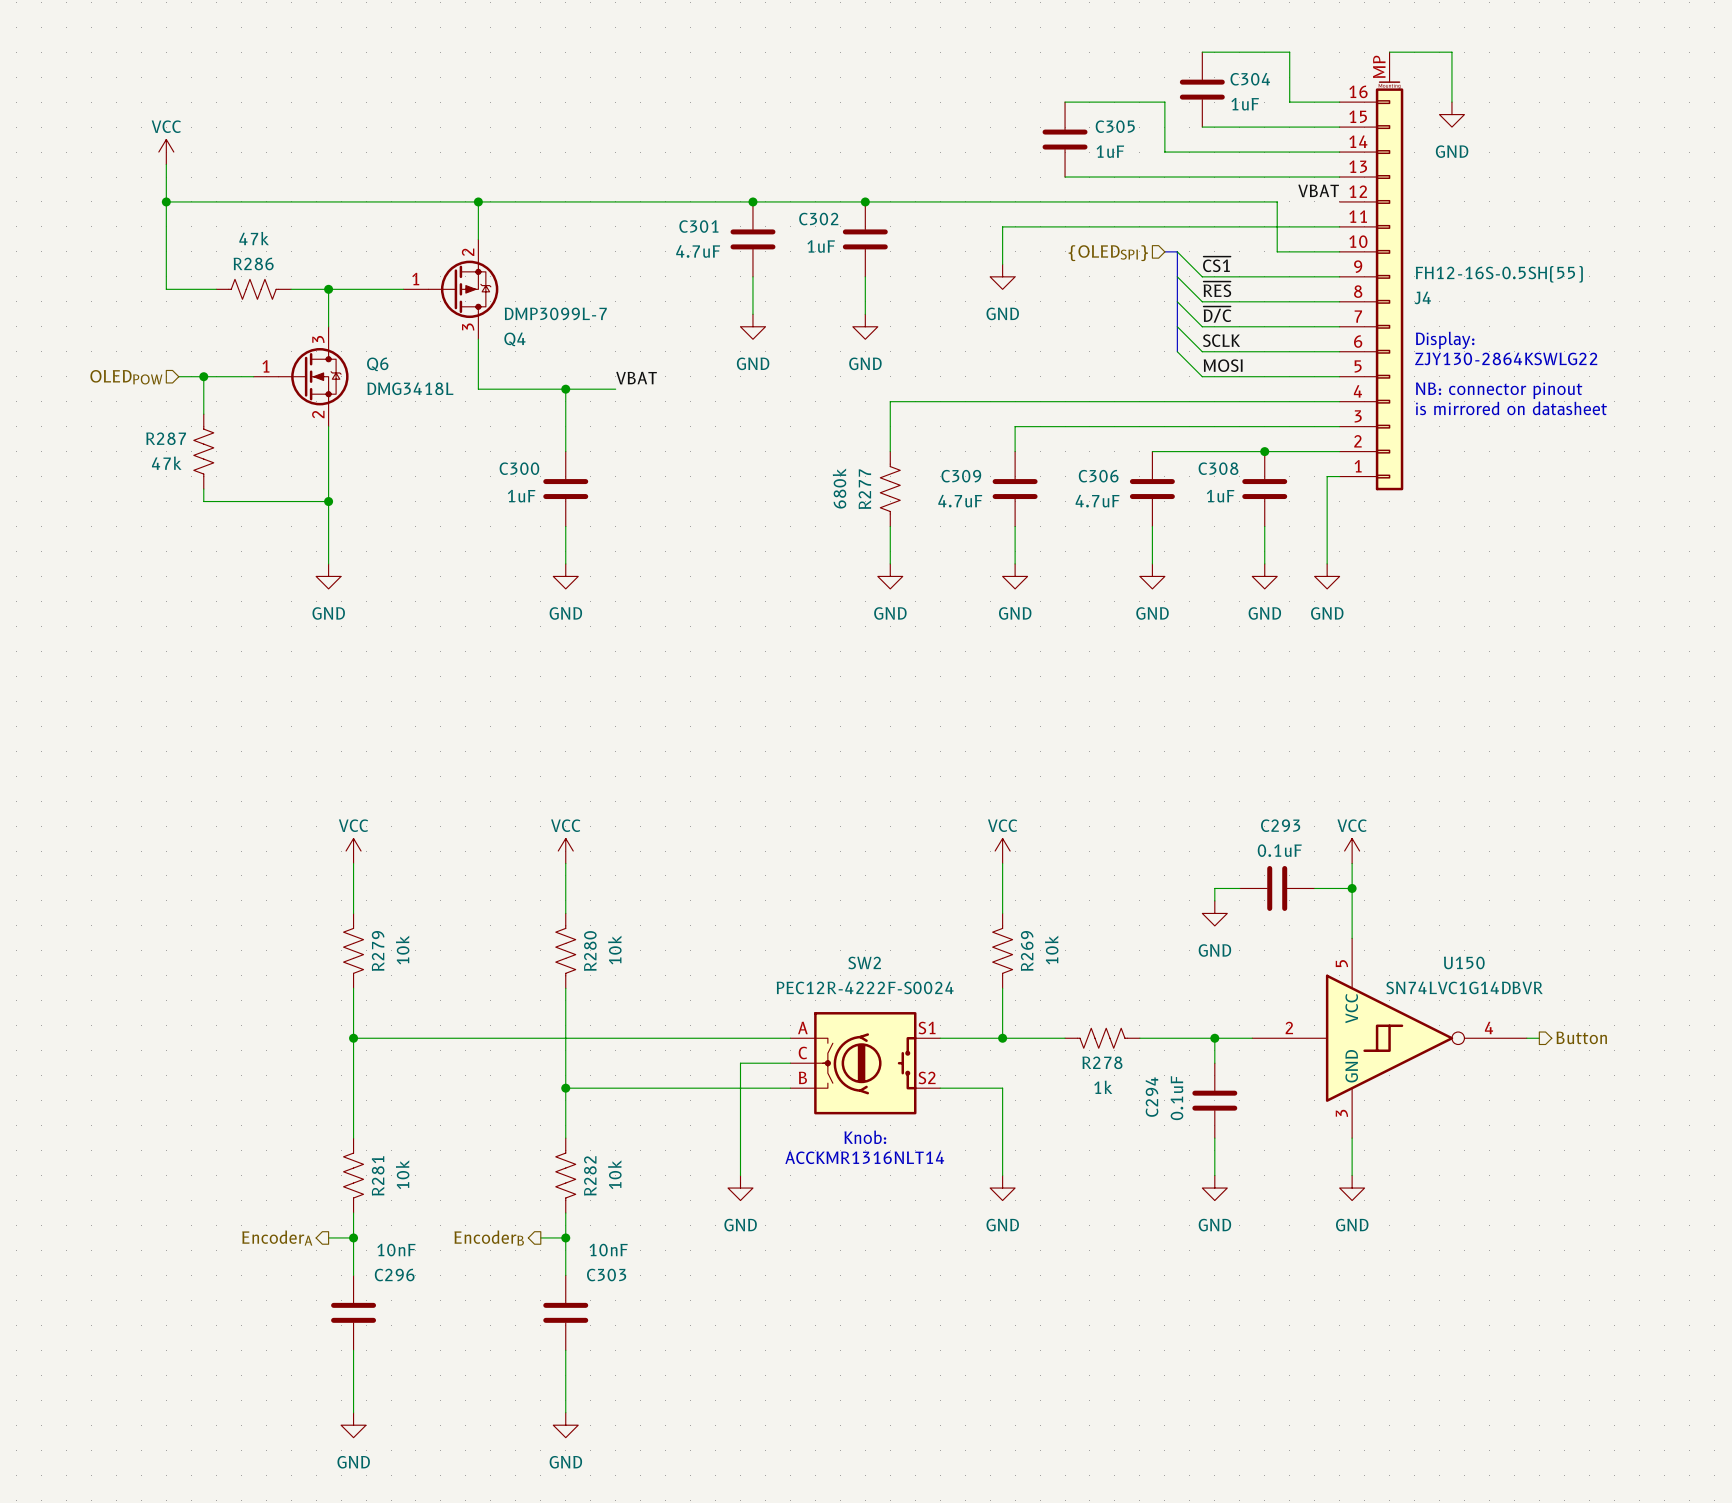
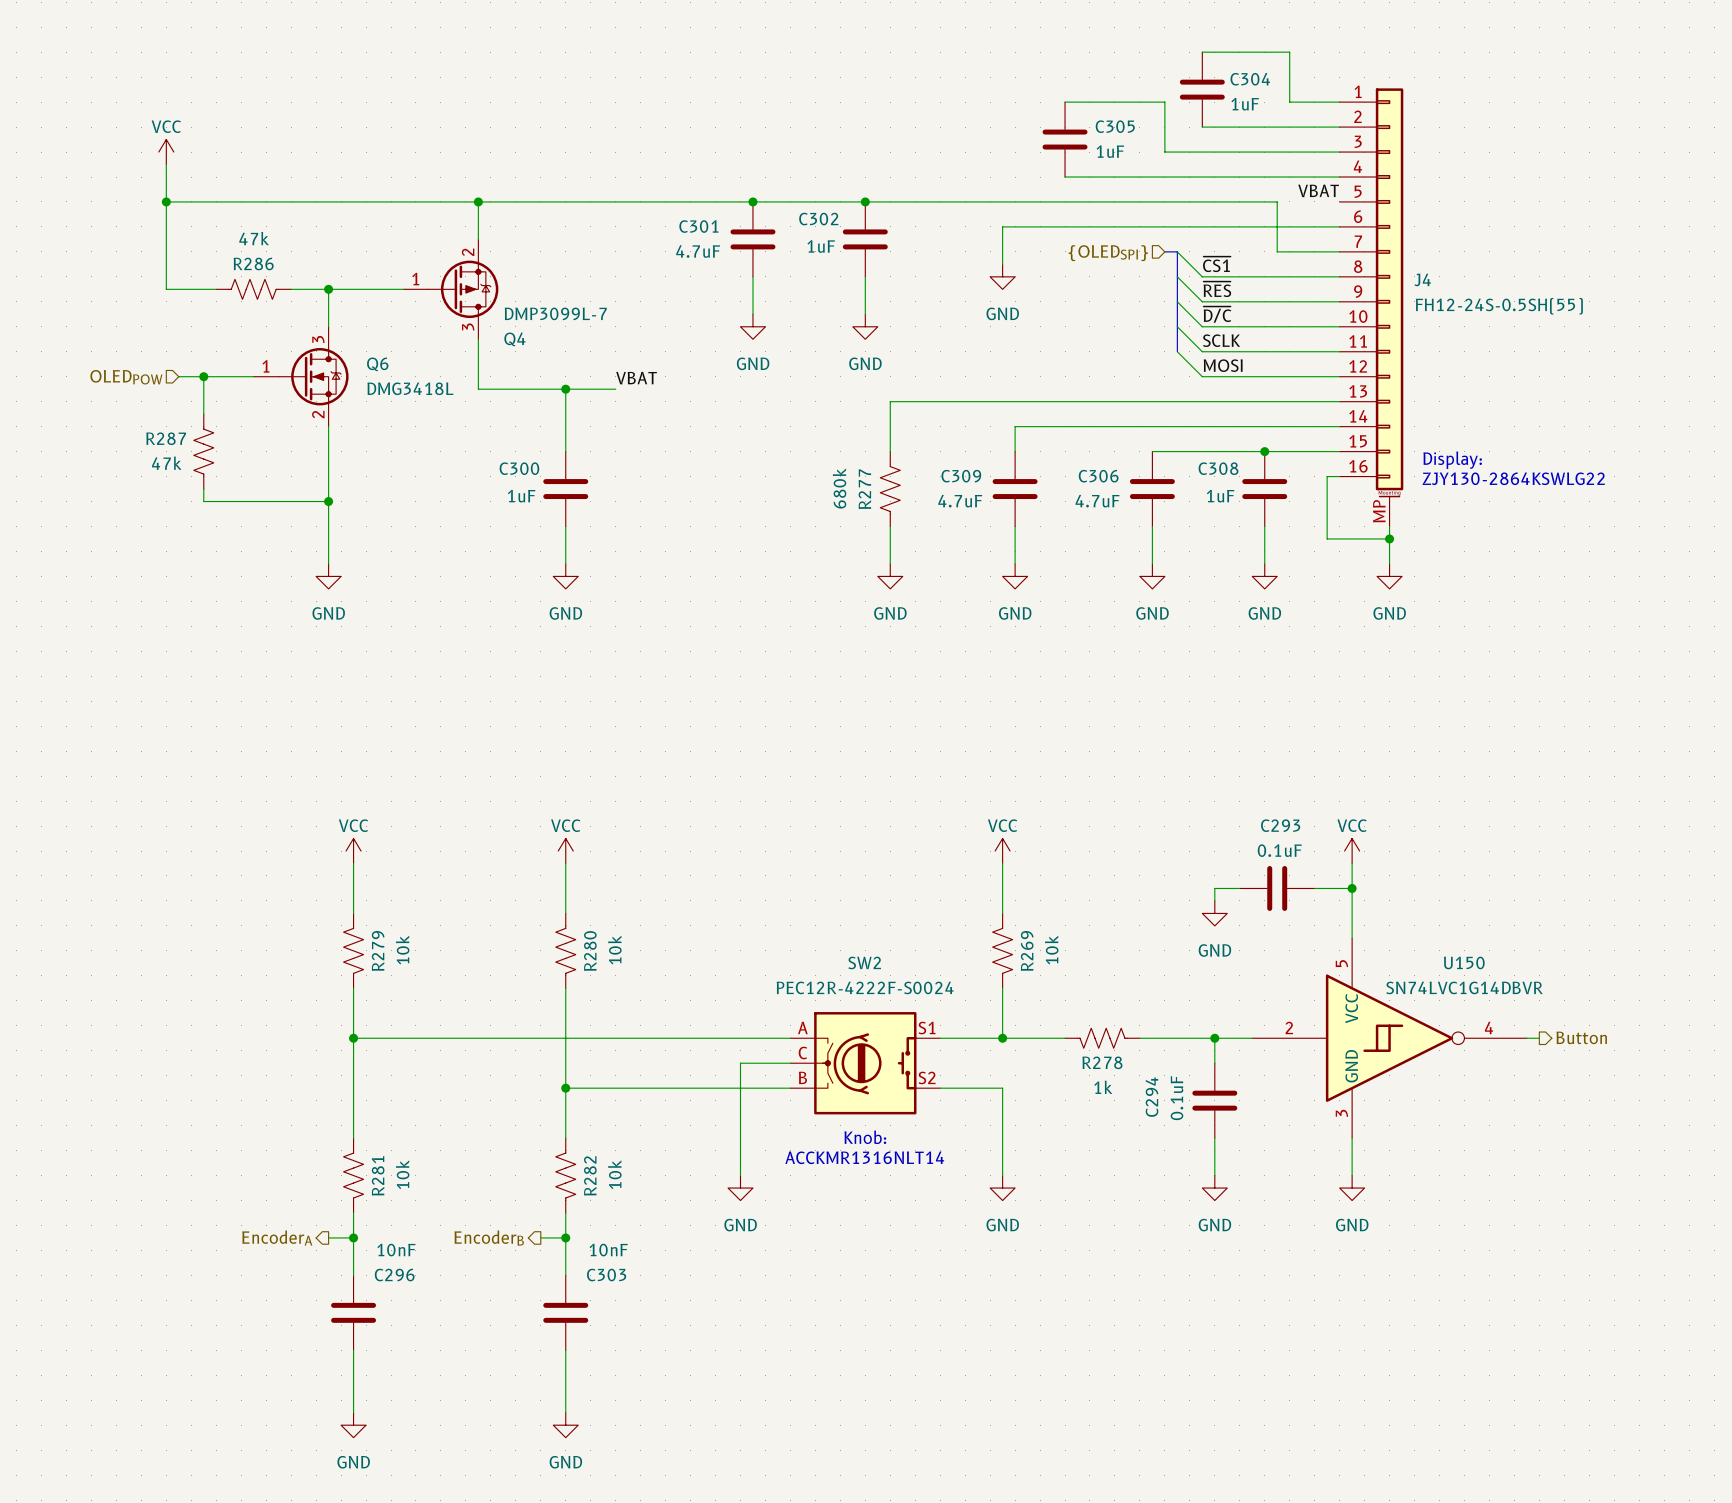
wire: (1389, 52) (1451, 52) (1451, 102) -> none
power symbol: GND (1451, 114) -> none
J4 value: FH12-16S-0.5SH(55) (1499, 274) -> FH12-24S-0.5SH(55) (1499, 306)
J4 flip: as is (1389, 285) -> up-down (1389, 292)
text position: Display: (1445, 340) -> Display: (1452, 460)
text position: ZJY130-2864KSWLG22 (1506, 358) -> ZJY130-2864KSWLG22 (1513, 478)
text: NB: connector pinout (1499, 390) -> none
text: is mirrored on datasheet (1511, 408) -> none
wire: none -> (1389, 526) (1389, 563)
wire: (1327, 538) (1327, 563) -> (1327, 538) (1389, 538)
junction: none -> (1389, 538)
power symbol position: GND (1327, 576) -> GND (1389, 576)

